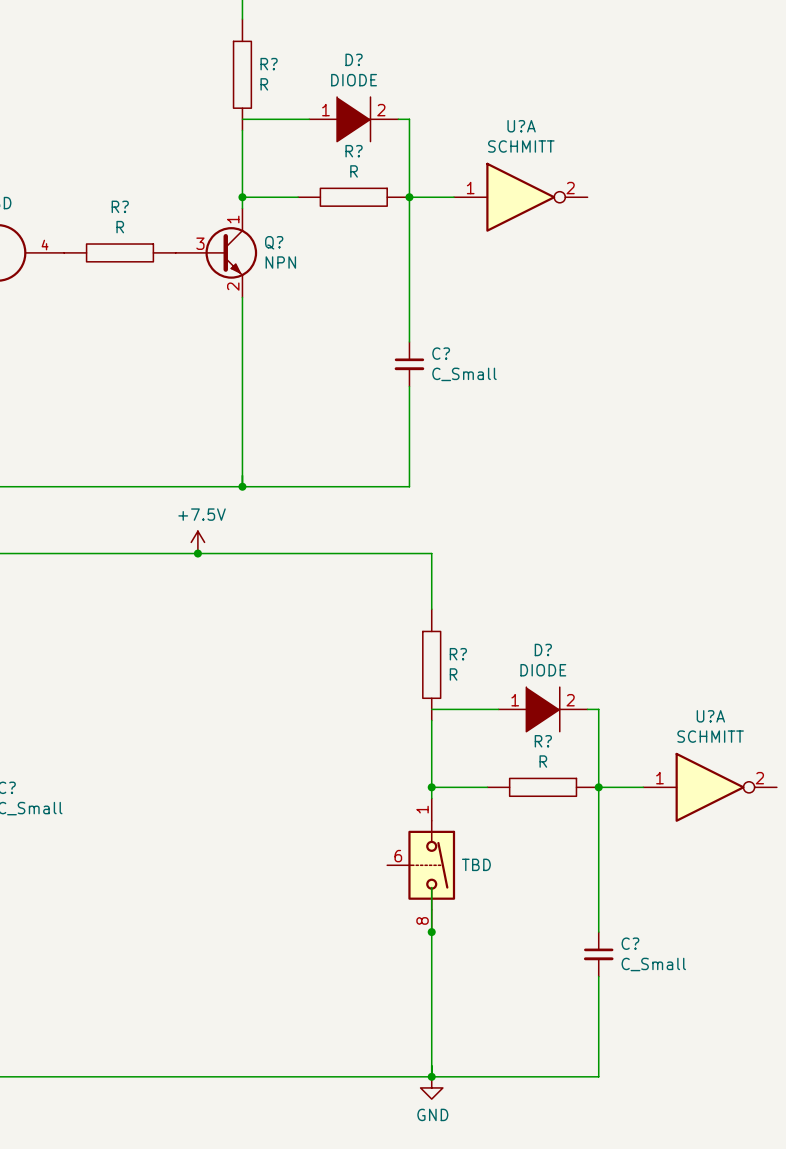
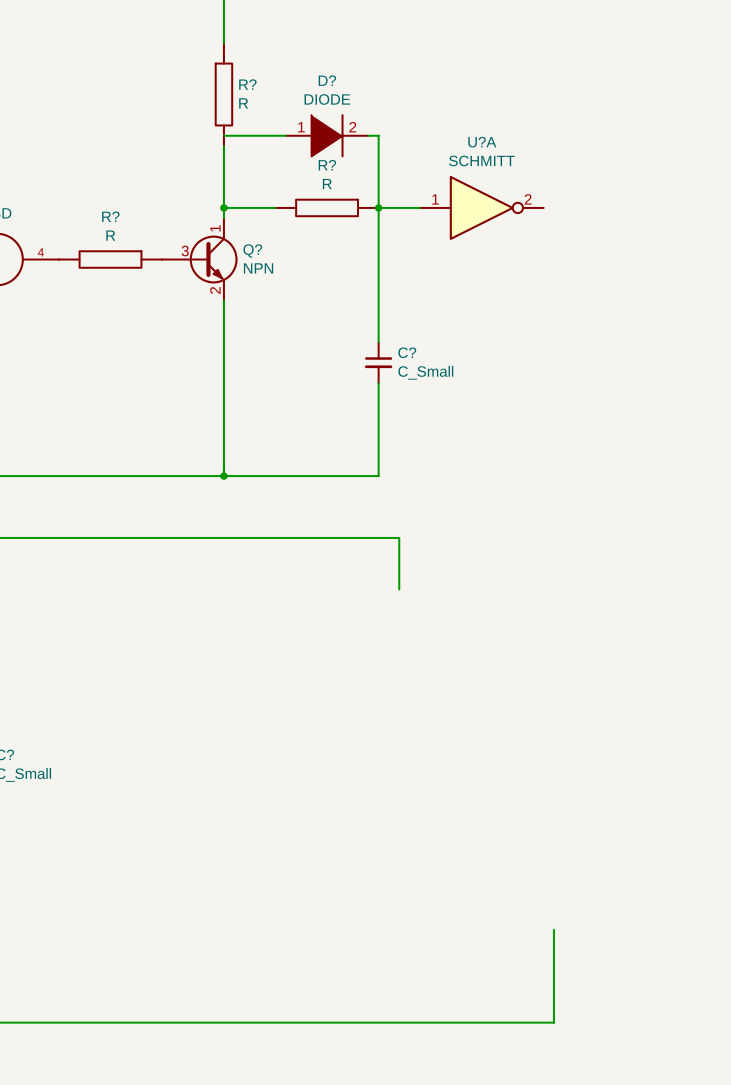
power symbol: +7.5V (197, 542) -> none
junction: (197, 553) -> none
R?: R (431, 664) -> none
wire: (431, 709) (498, 709) -> none
D?: DIODE (543, 709) -> none
wire: (587, 709) (598, 709) (598, 932) -> none
wire: (431, 720) (431, 798) -> none
wire: (431, 787) (487, 787) -> none
junction: (431, 787) -> none
R?: R (543, 787) -> none
wire: (598, 787) (643, 787) -> none
junction: (598, 787) -> none
U?A: SCHMITT (710, 787) -> none
part: TBD (421, 865) -> none
wire: (431, 887) (431, 1076) -> none
junction: (431, 932) -> none
C?: C_Small (598, 954) -> none
junction: (431, 1076) -> none
power symbol: GND (431, 1087) -> none

